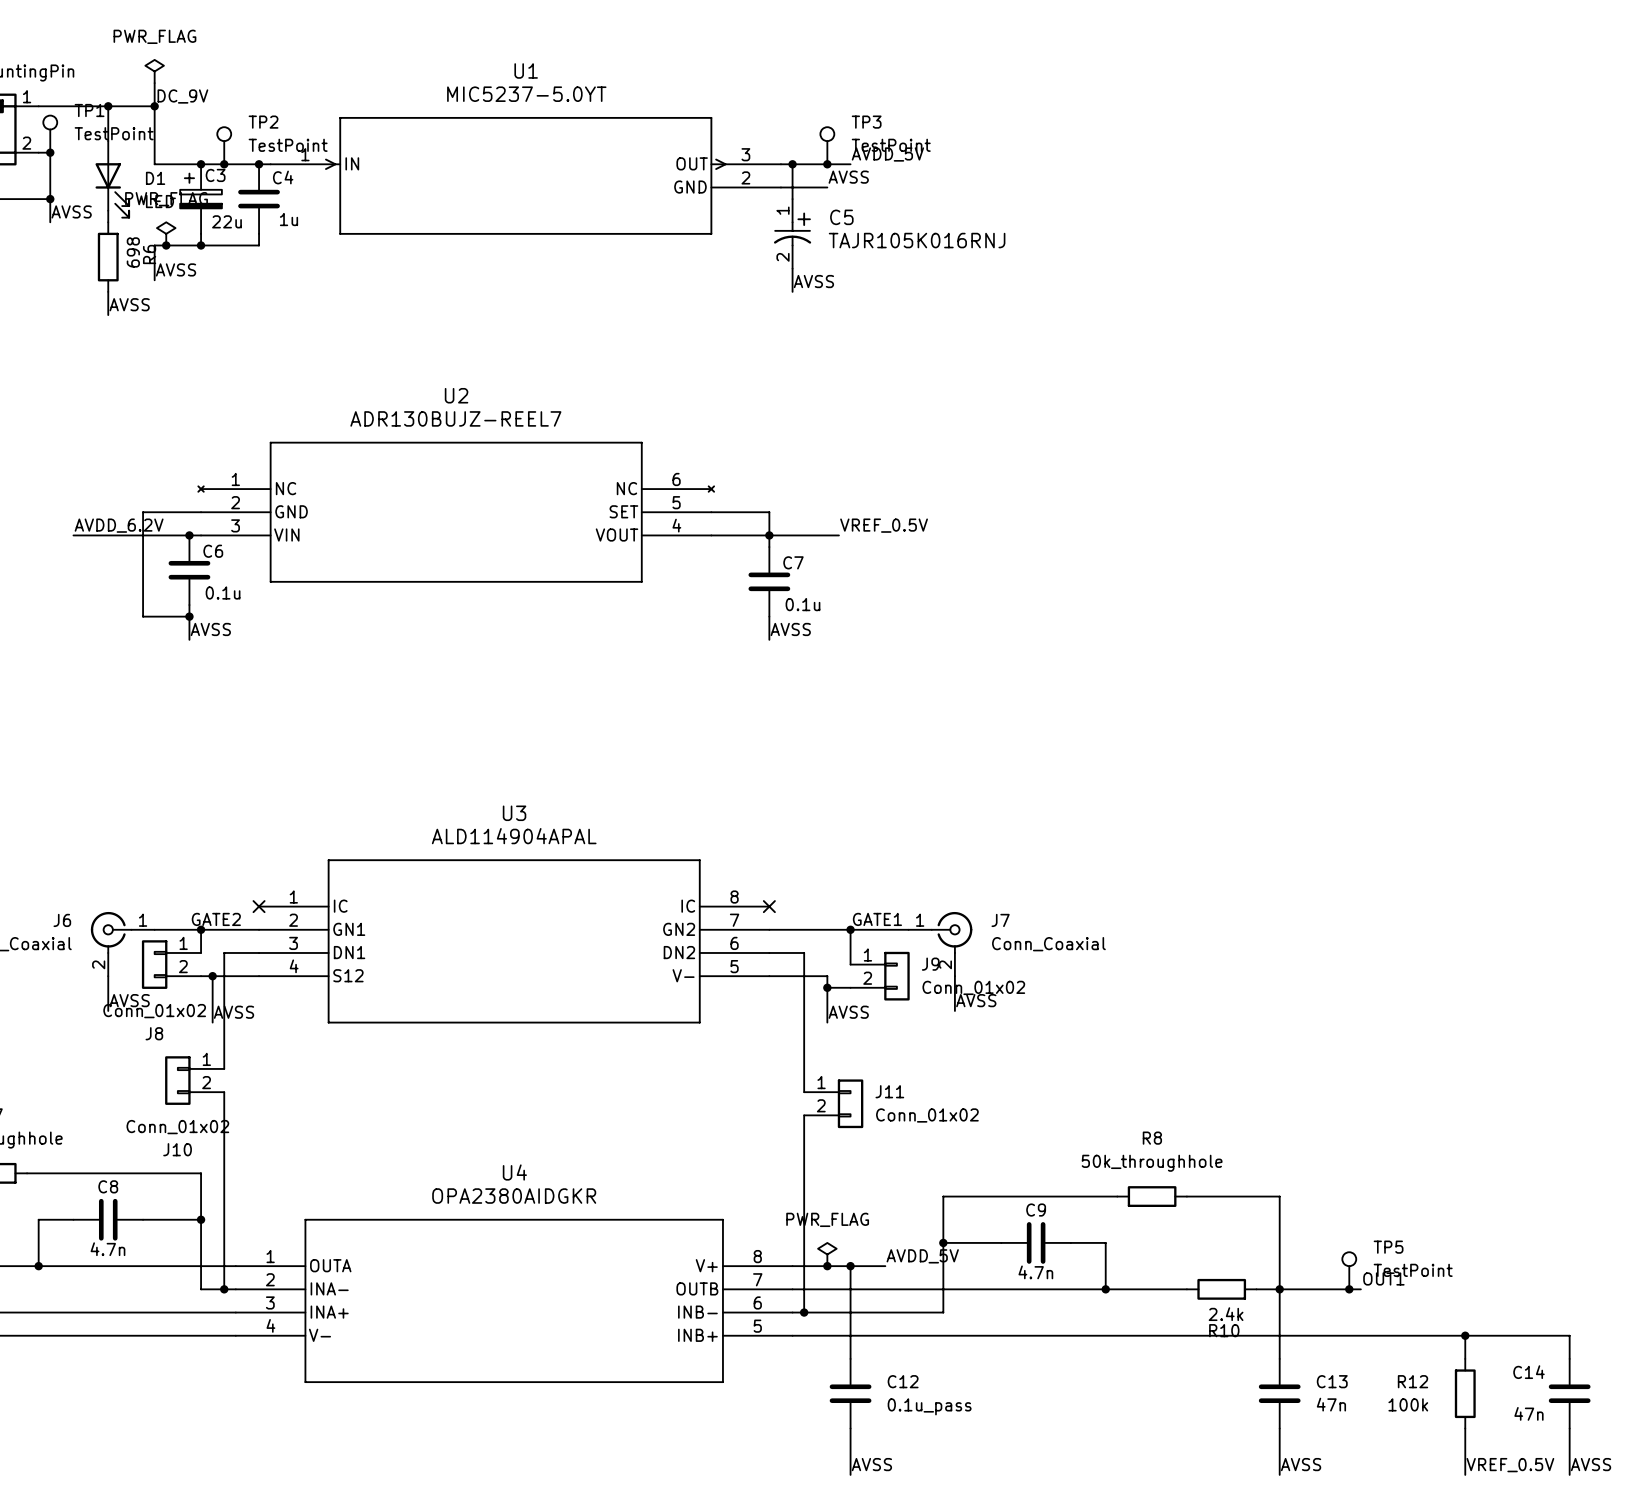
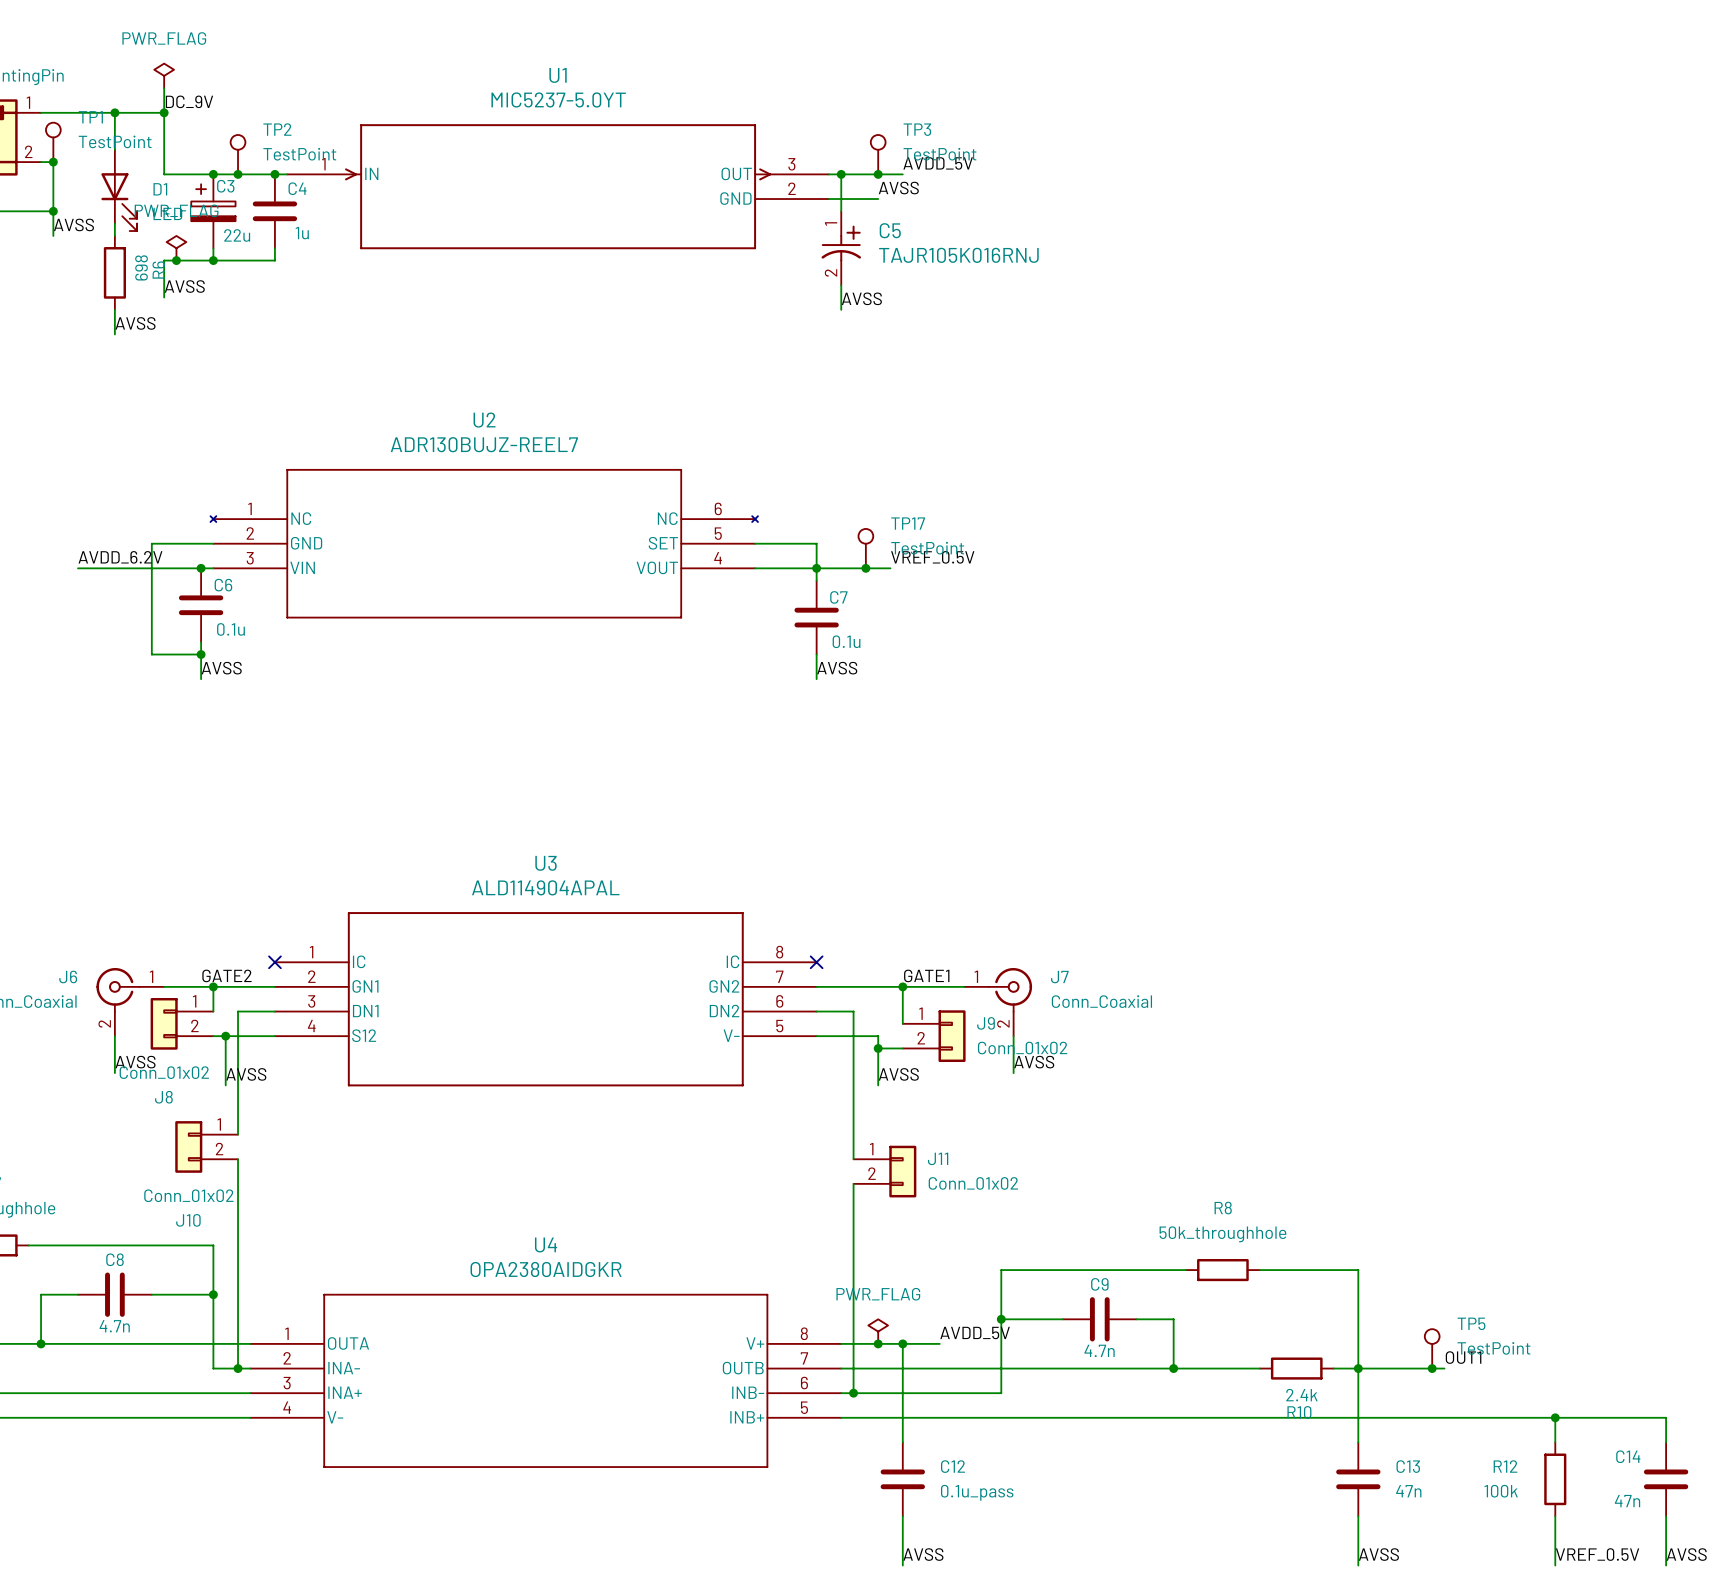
TP17: none -> TestPoint (865, 548)
junction: none -> (865, 568)

